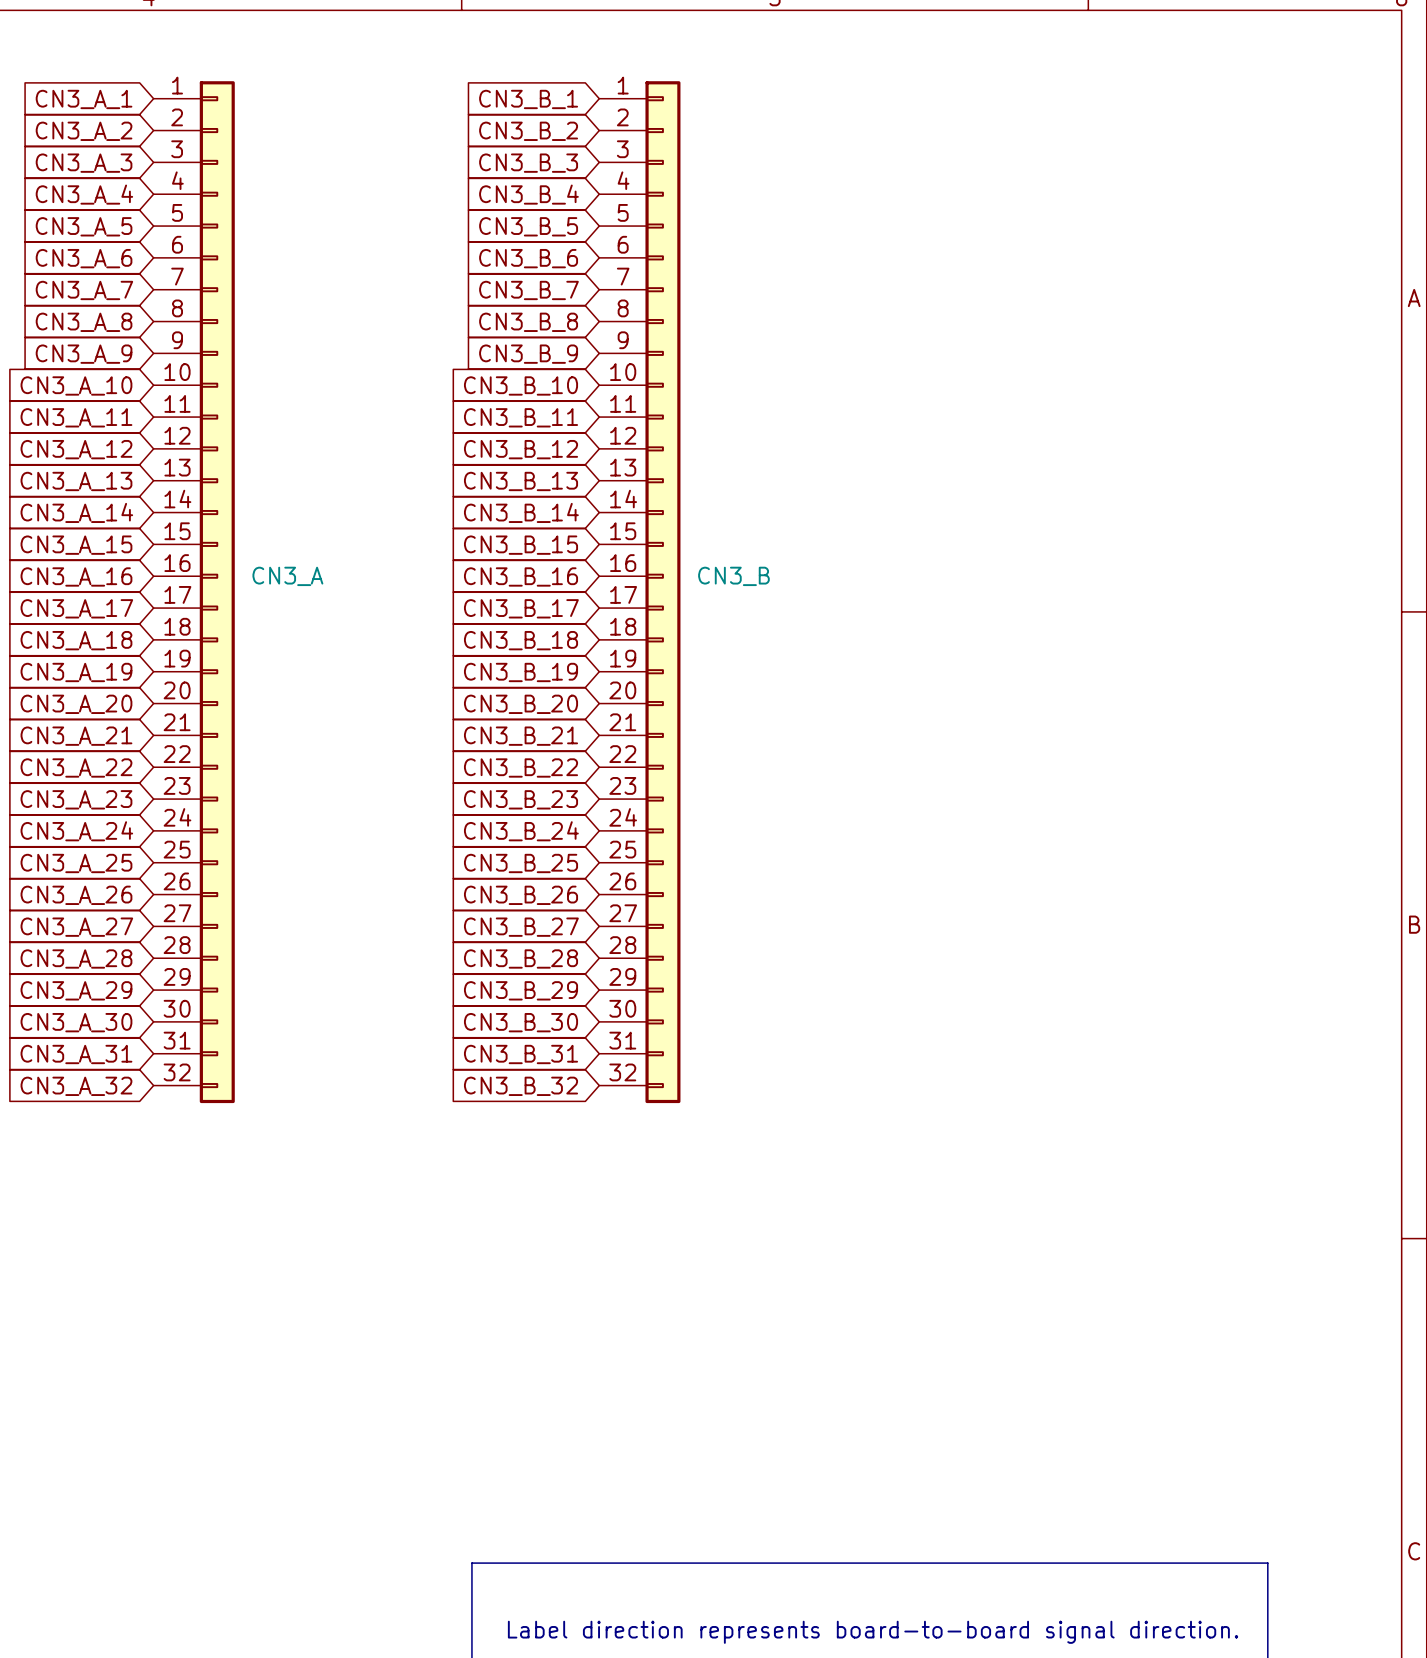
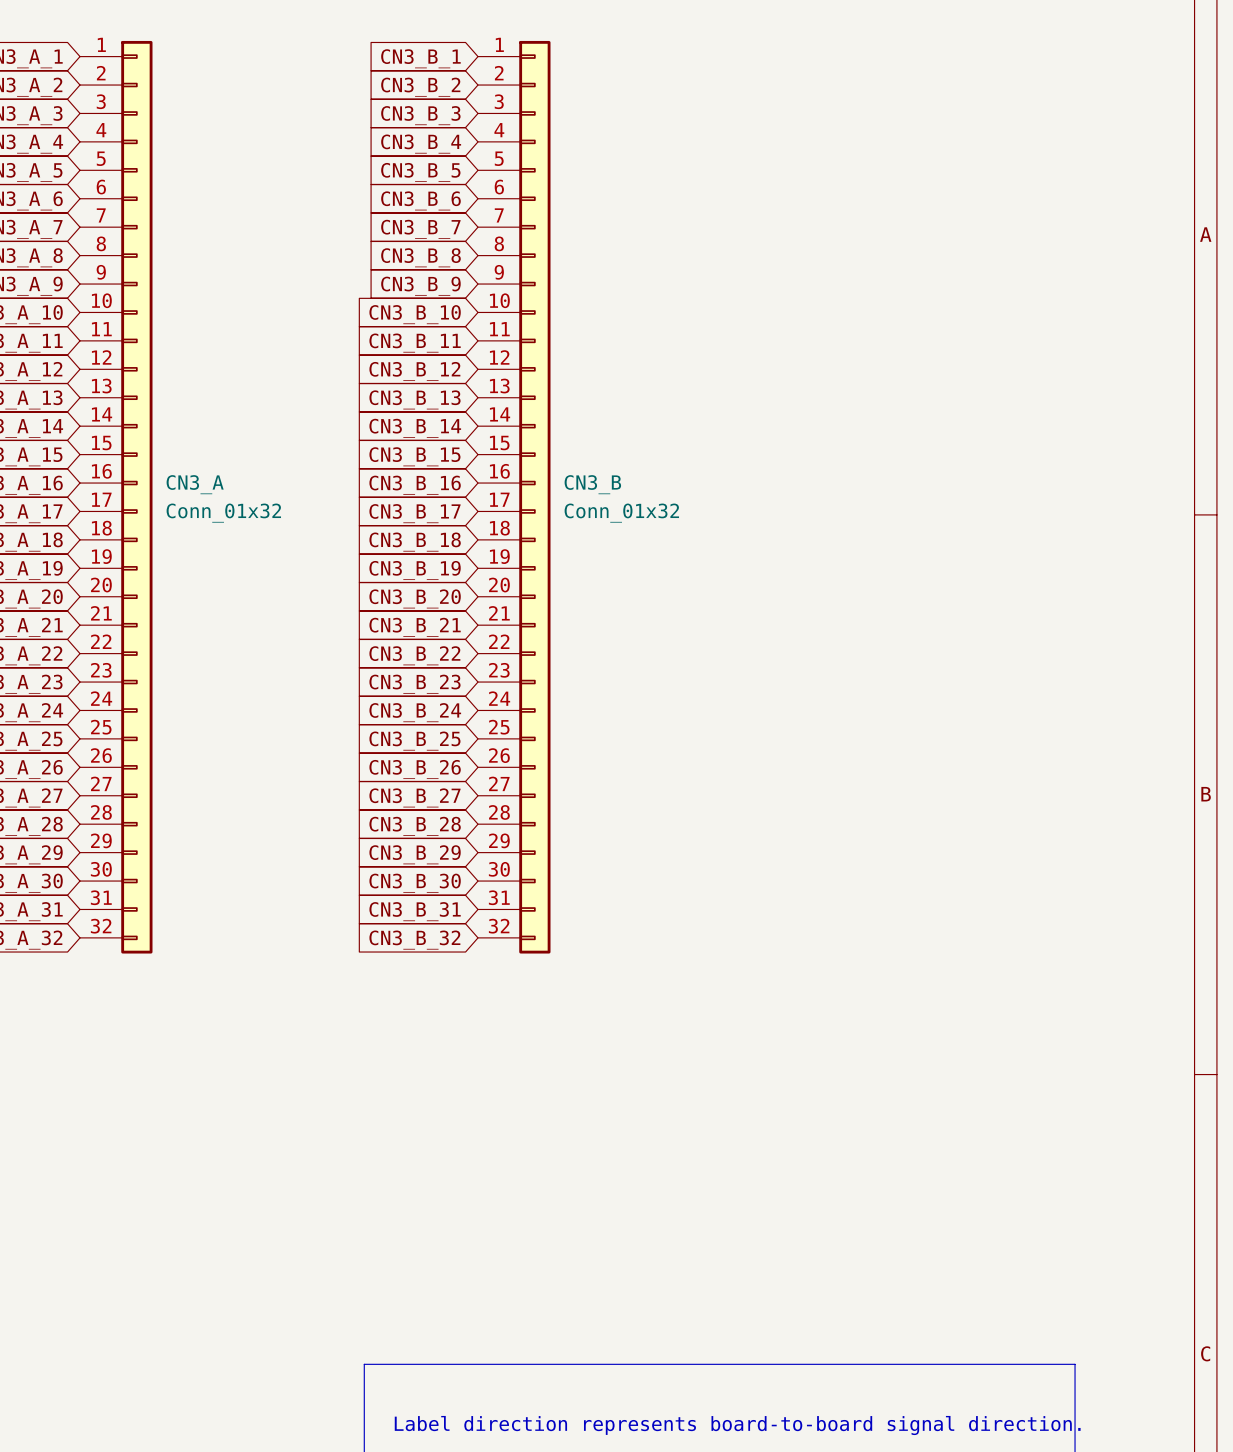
CN3_A value: none -> Conn_01x32 (223, 513)
CN3_B value: none -> Conn_01x32 (621, 513)

